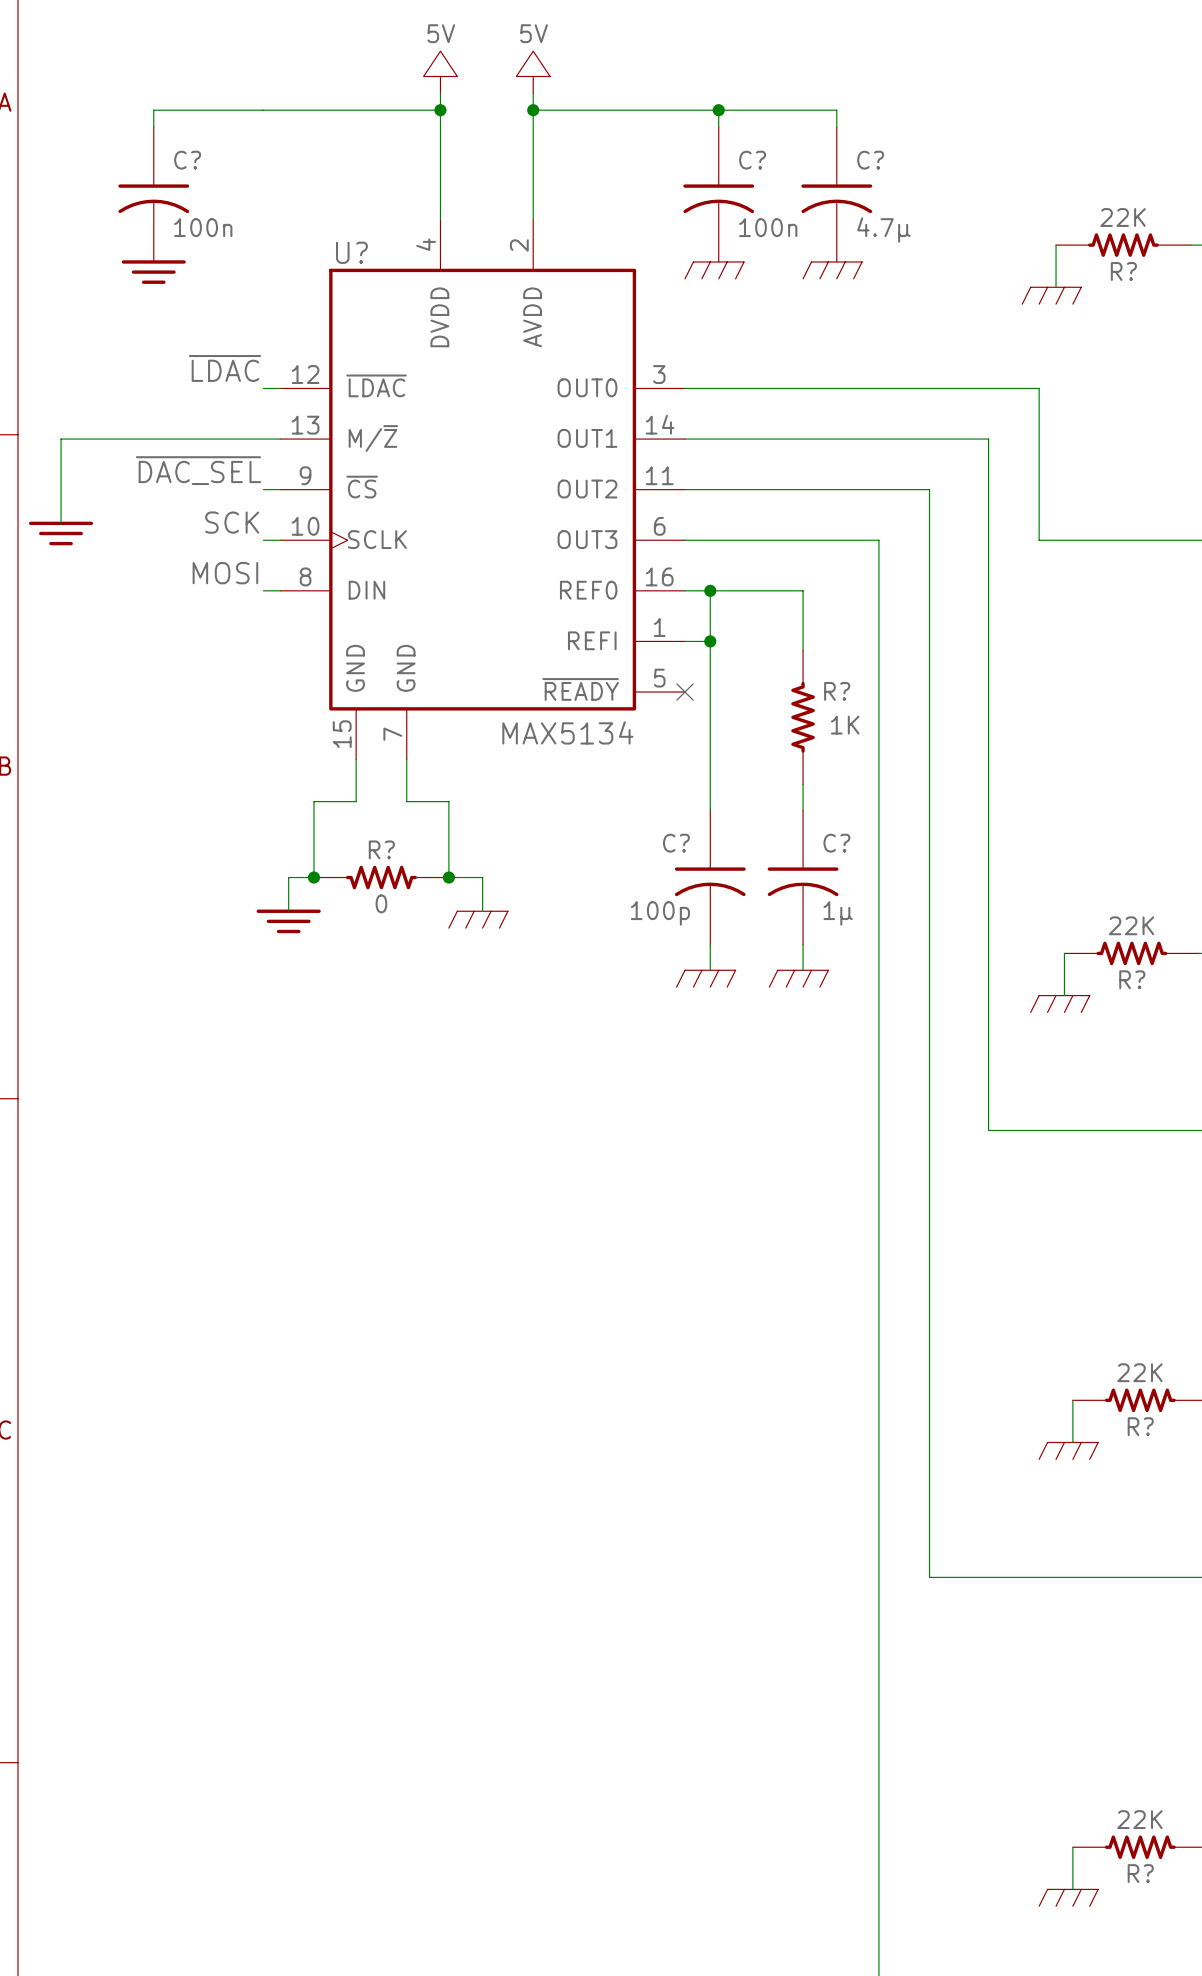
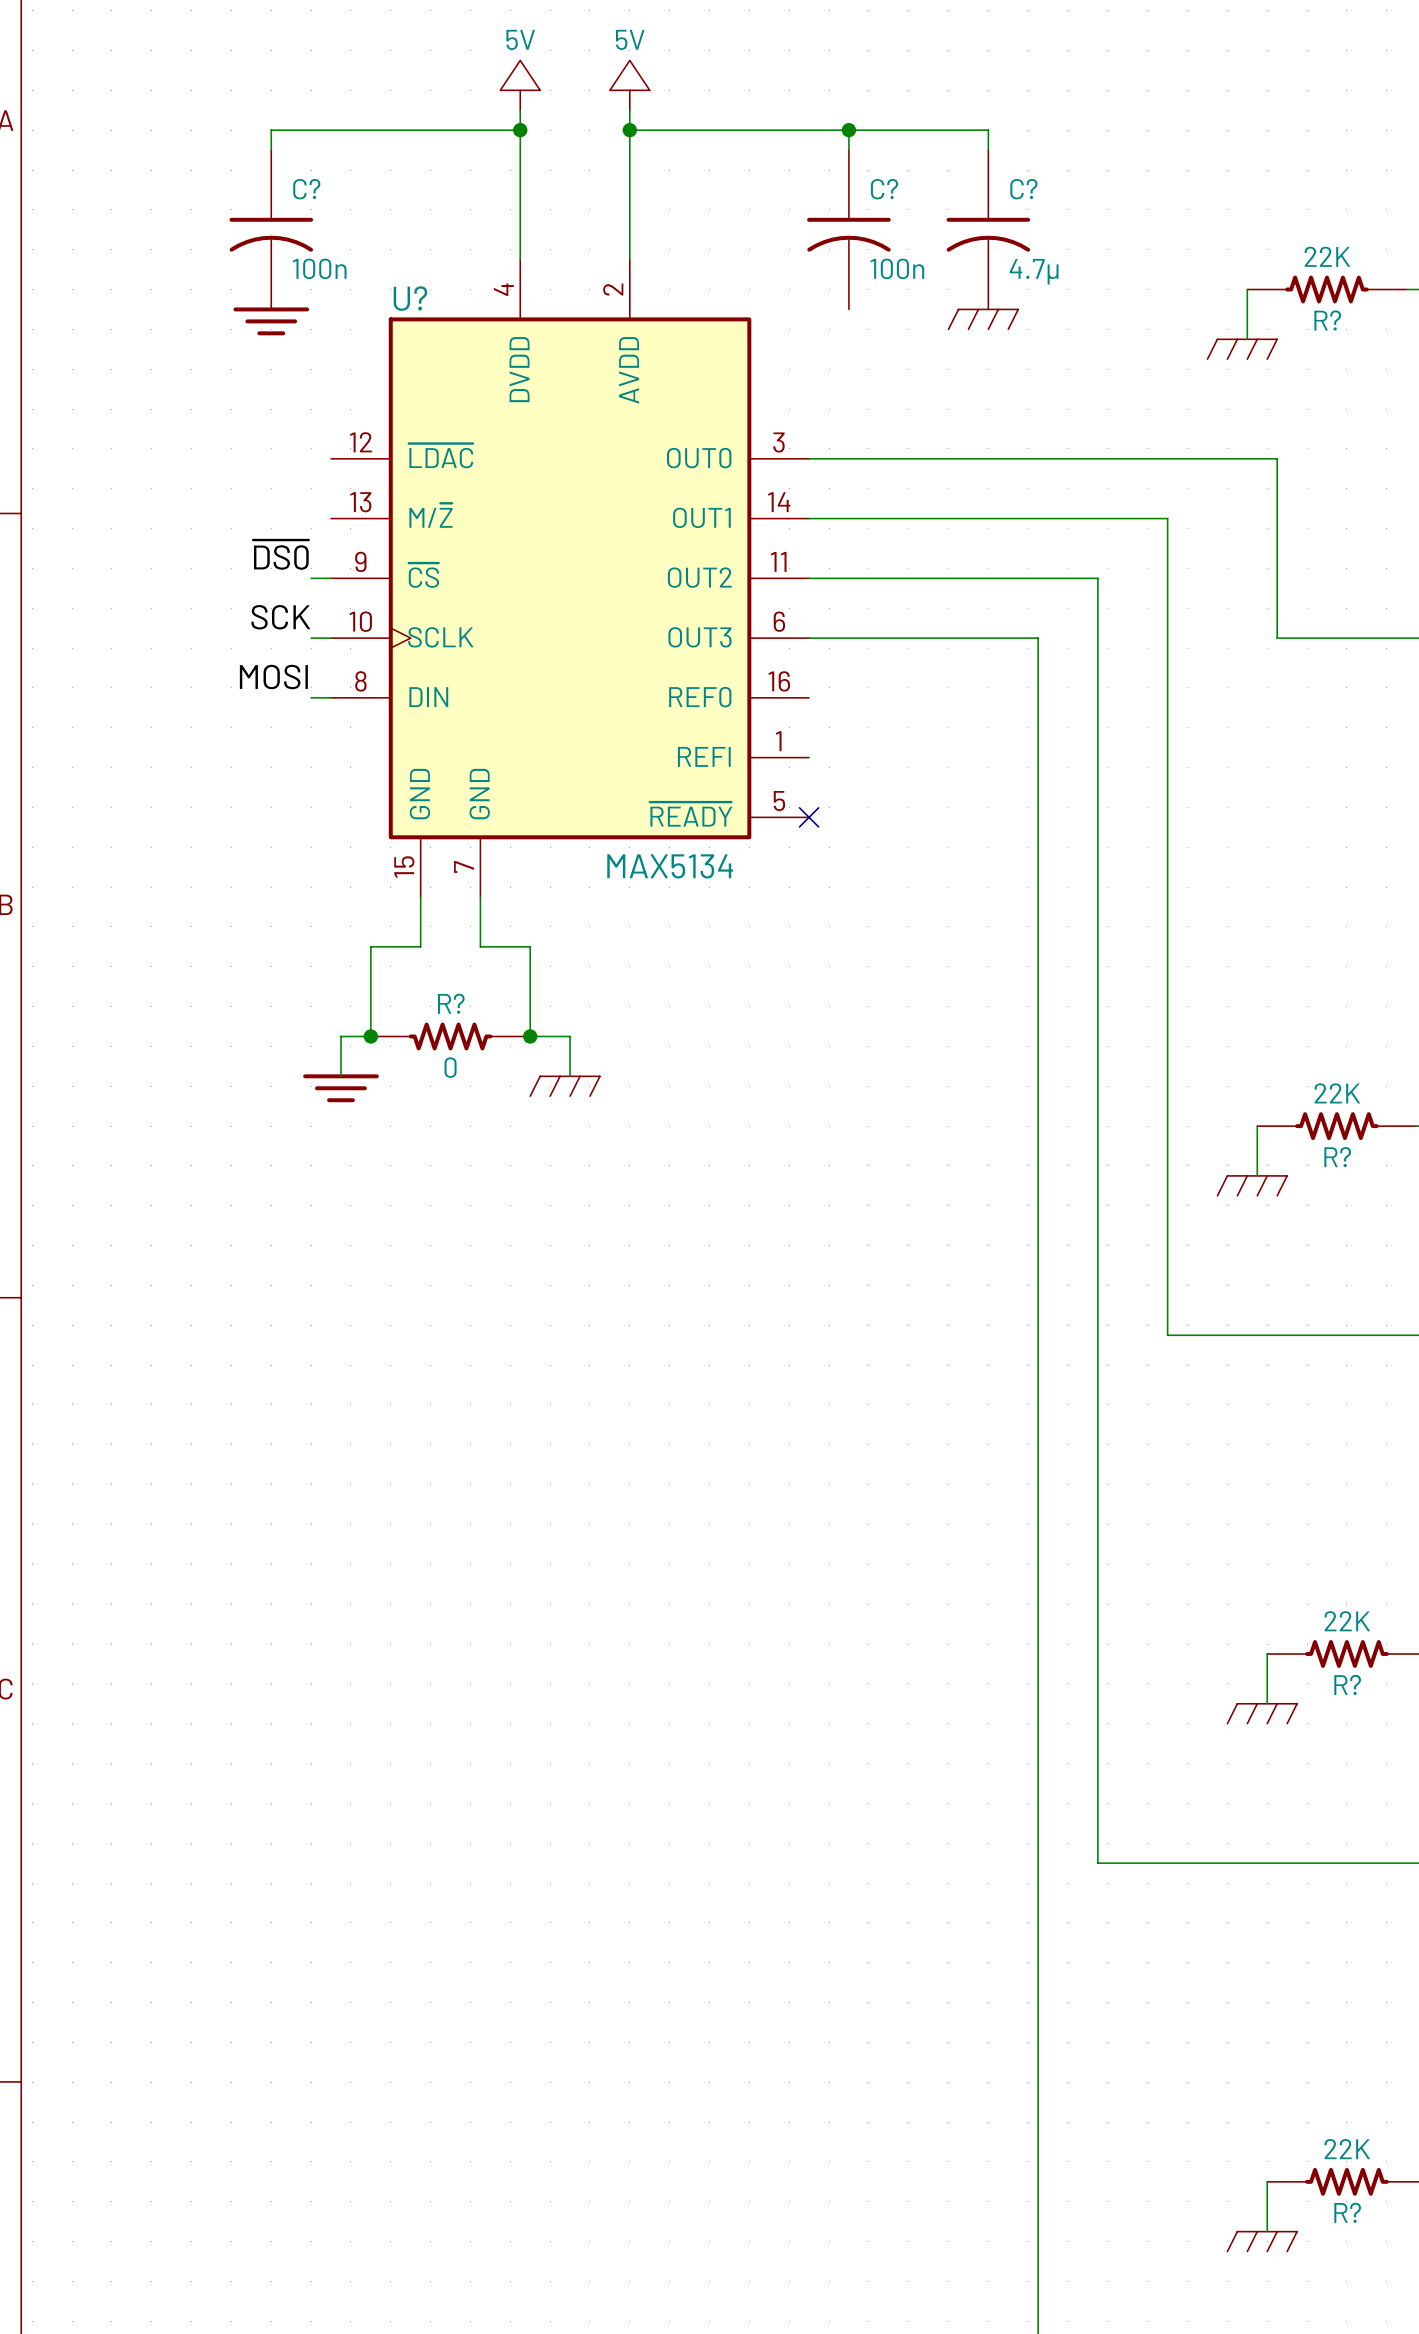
wire: (229, 110) (153, 110) (153, 127) -> (271, 130) (271, 150)
C? position: (153, 194) -> (271, 229)
power symbol: (714, 270) -> none
power symbol position: (153, 272) -> (271, 321)
label: ~{LDAC} (224, 368) -> none
wire: (263, 388) (280, 388) -> none
wire: (1039, 388) (1039, 540) (1081, 540) -> (1227, 458) (1277, 458) (1277, 638)
wire: (280, 439) (61, 439) (61, 523) -> none
label: ~{DAC_SEL} (198, 470) -> ~{DS0} (280, 554)
power symbol: (61, 533) -> none
wire: (685, 590) (803, 590) (803, 649) -> none
wire: (710, 590) (710, 810) -> none
junction: (710, 590) -> none
wire: (685, 641) (710, 641) -> none
junction: (710, 641) -> none
R?: 1K (803, 717) -> none
wire: (803, 784) (803, 810) -> none
C?: 100p (710, 877) -> none
C?: 1μ (803, 877) -> none
wire: (710, 944) (710, 970) -> none
wire: (803, 944) (803, 970) -> none
power symbol: (706, 978) -> none
power symbol: (798, 978) -> none

